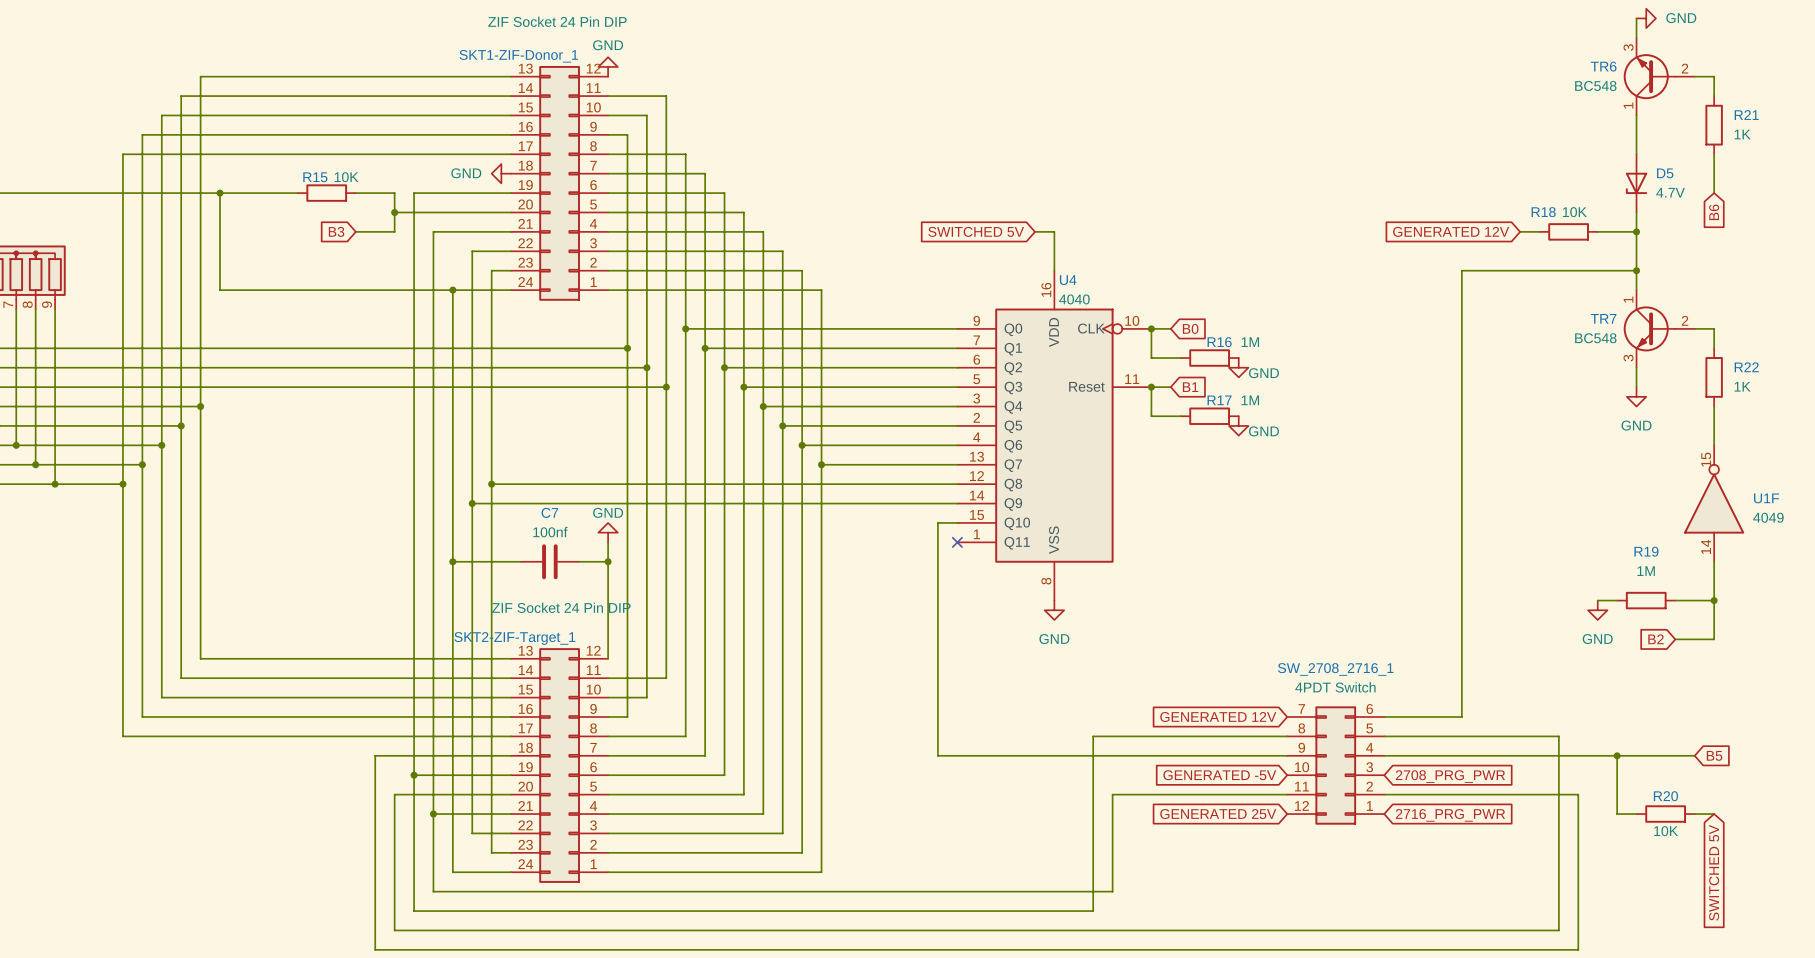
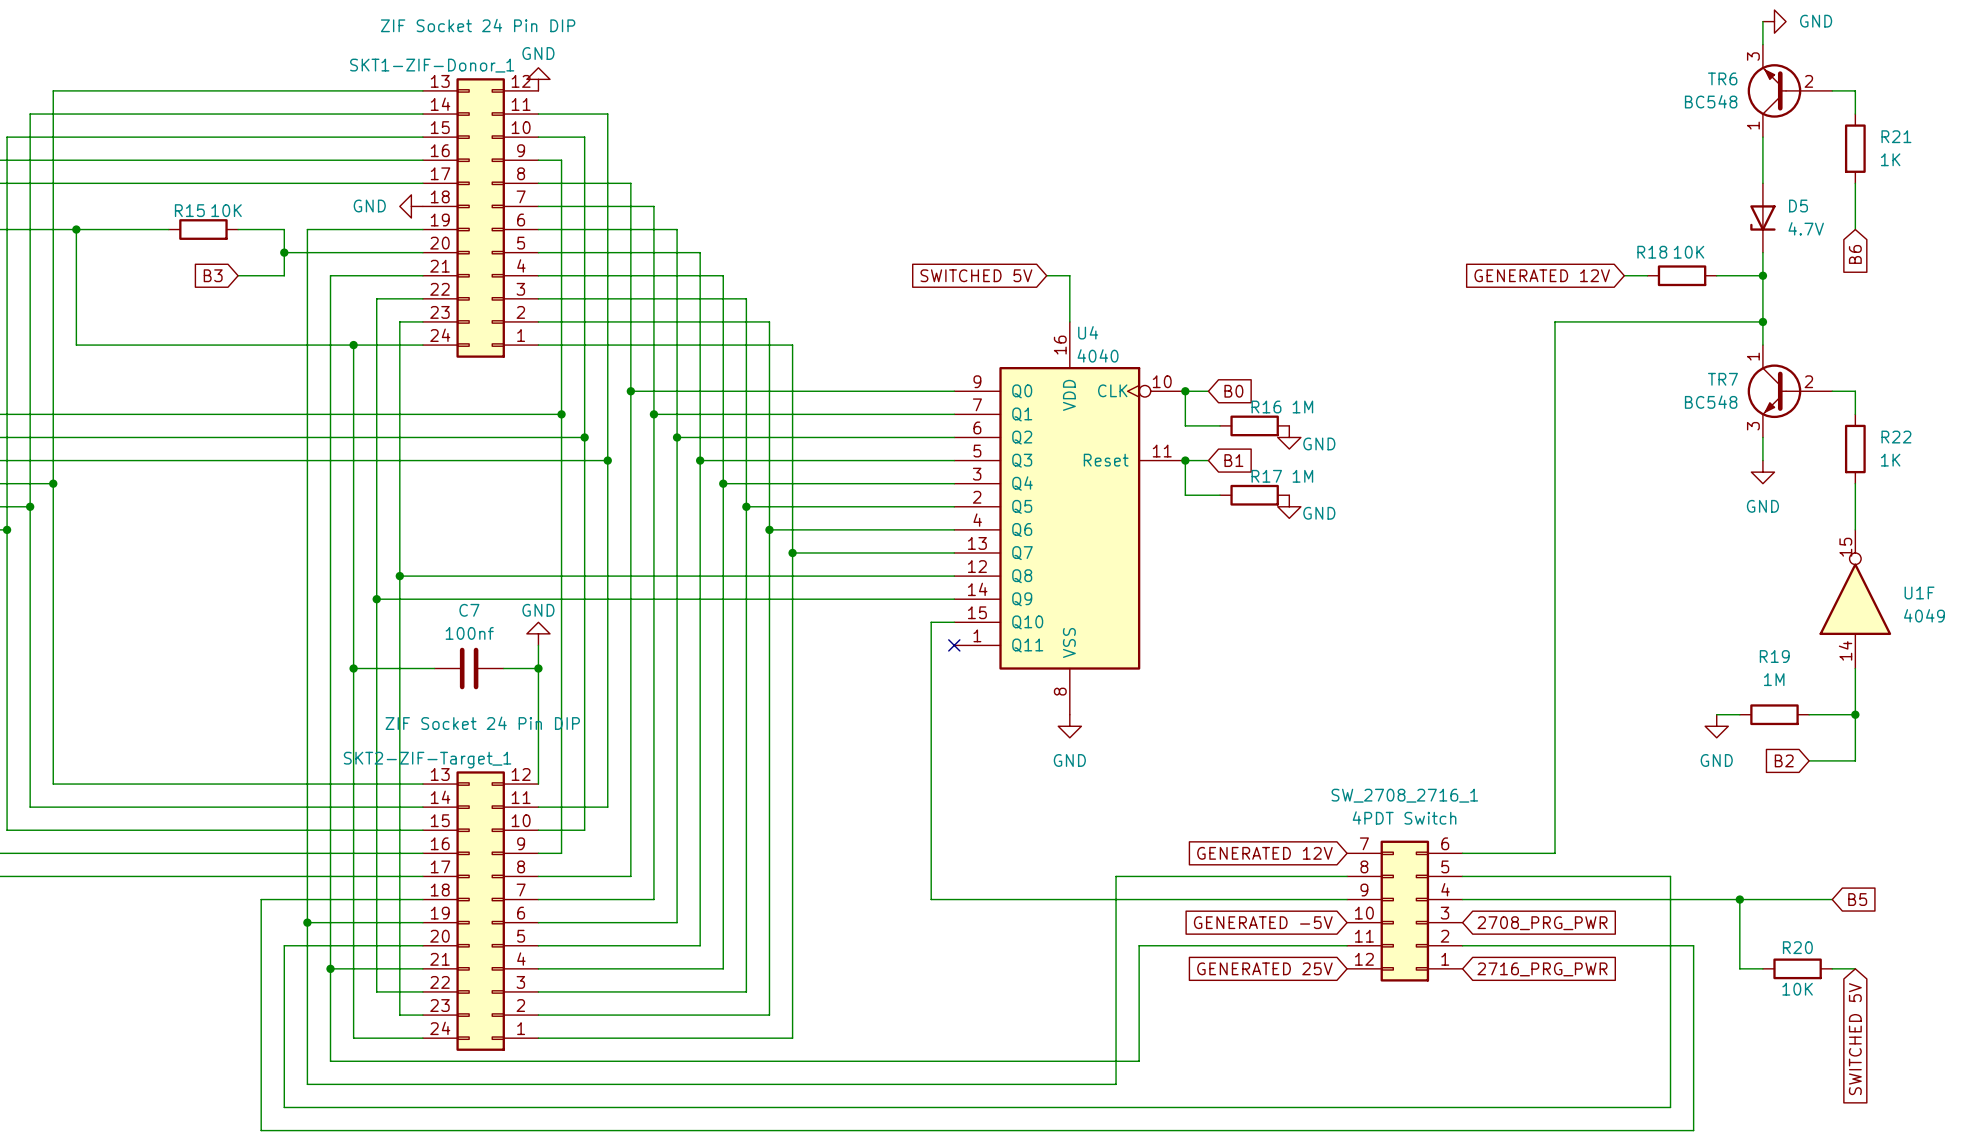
TR6 symbol: [1623, 37, 1695, 116] -> [1747, 44, 1833, 138]
TR7 symbol: [1623, 290, 1695, 368] -> [1747, 345, 1833, 438]

